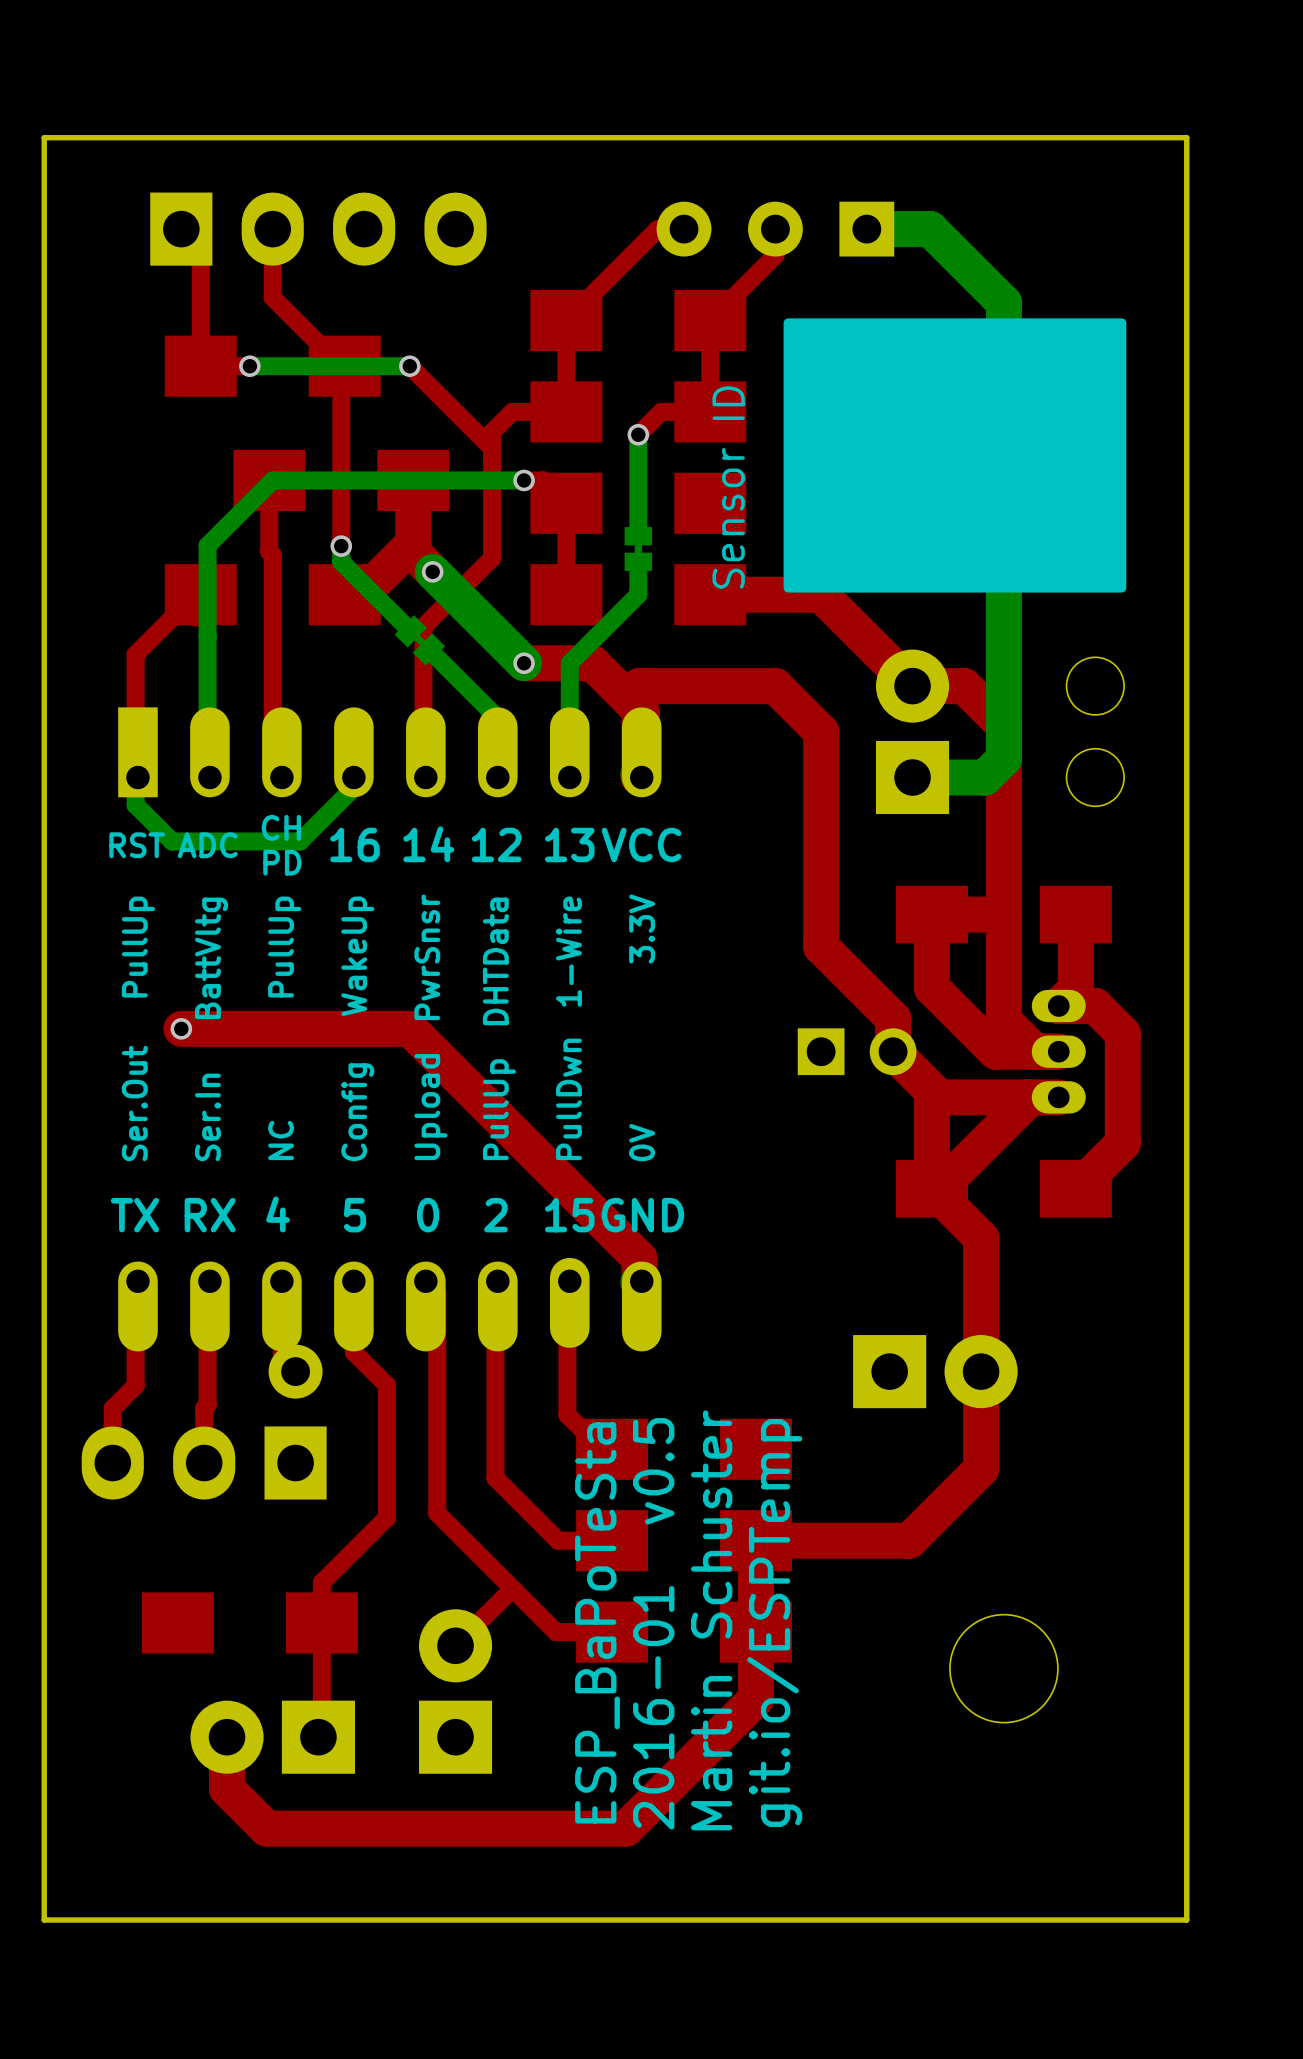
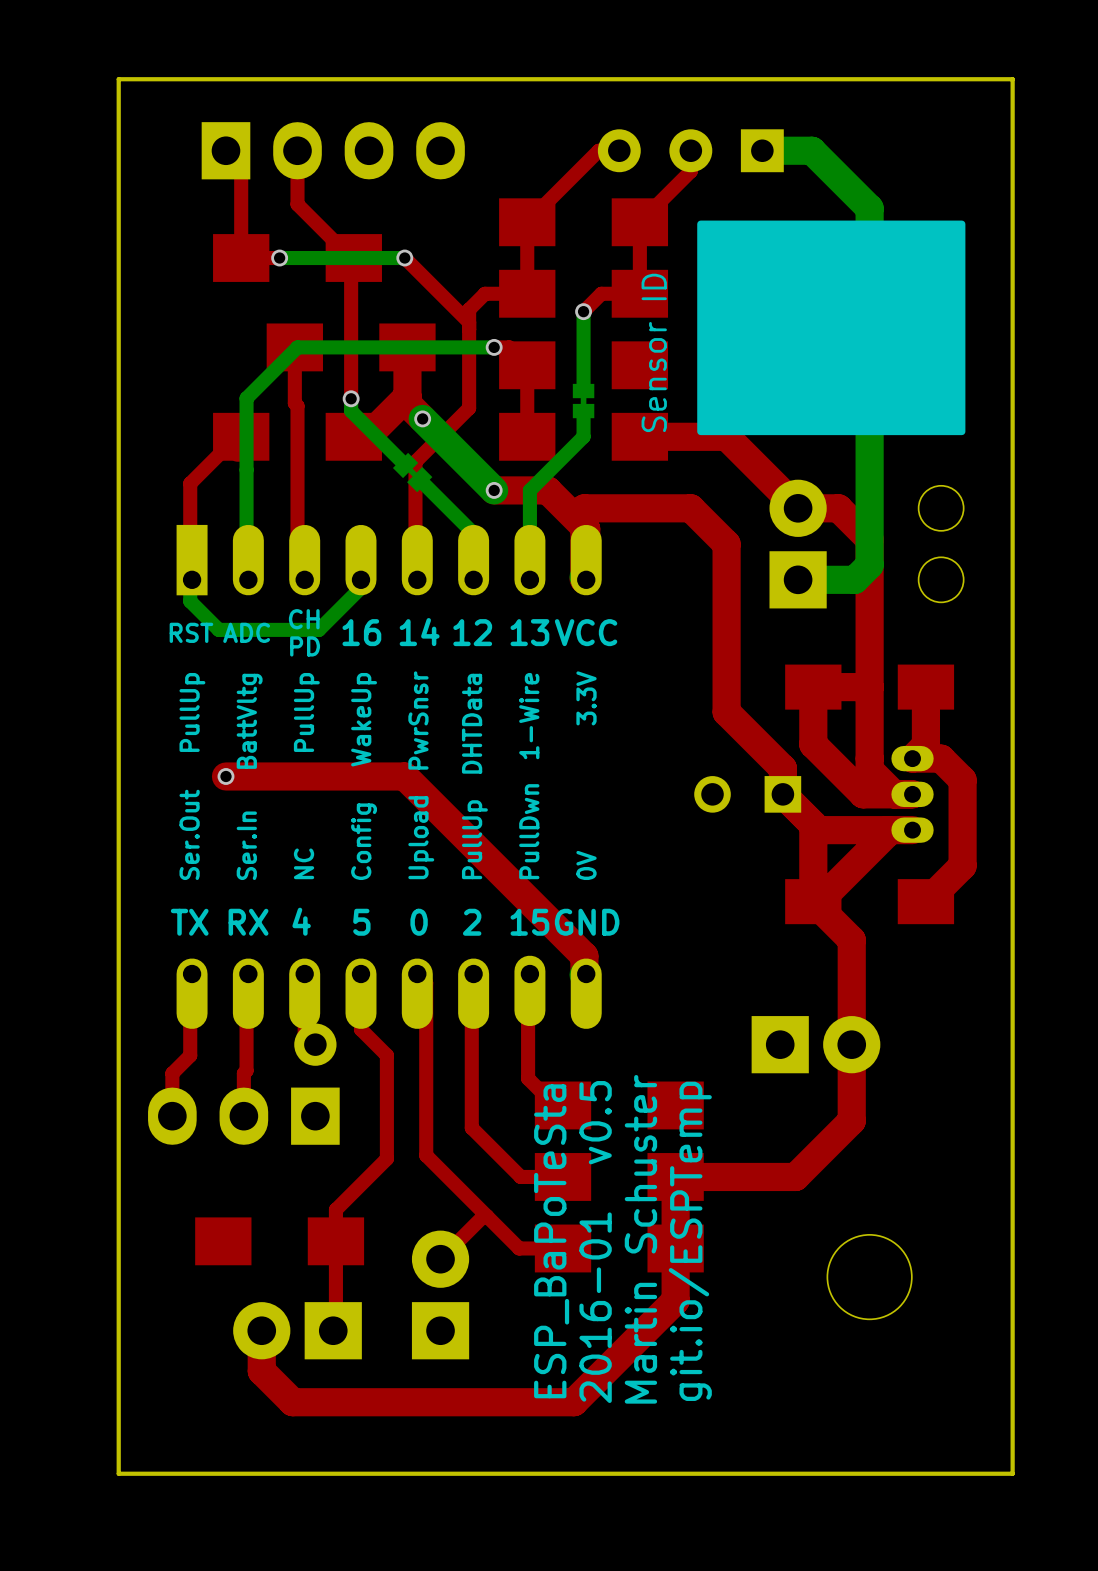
part footprint: [797, 1028, 917, 1076] -> [694, 776, 802, 813]

